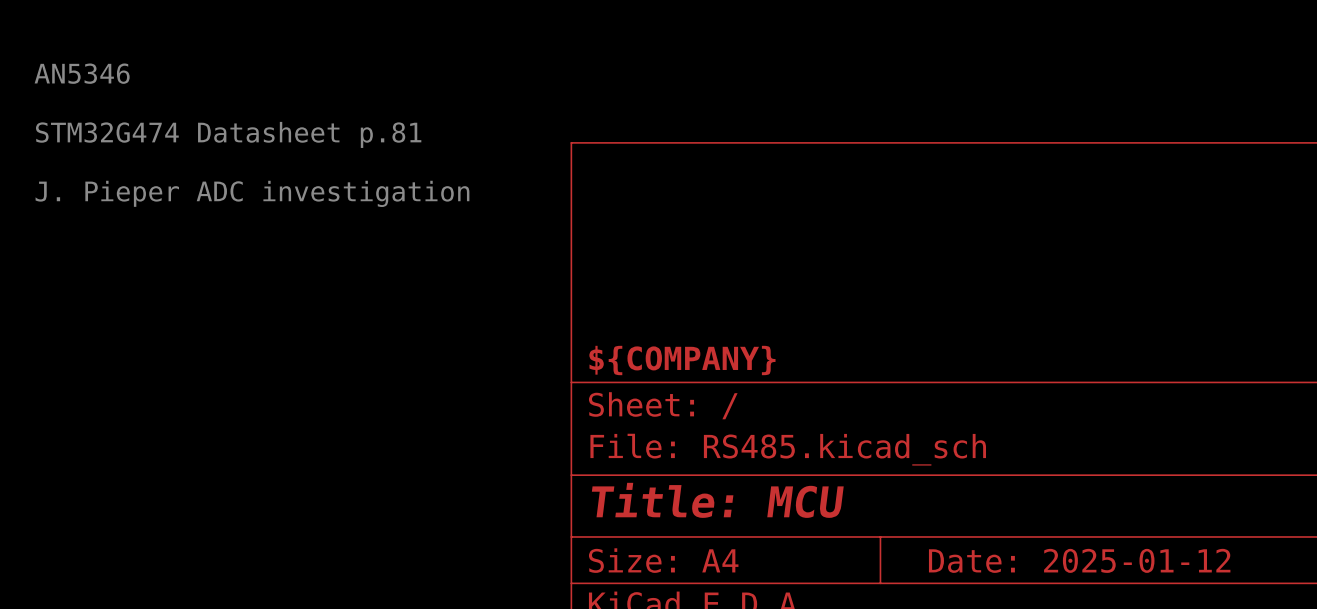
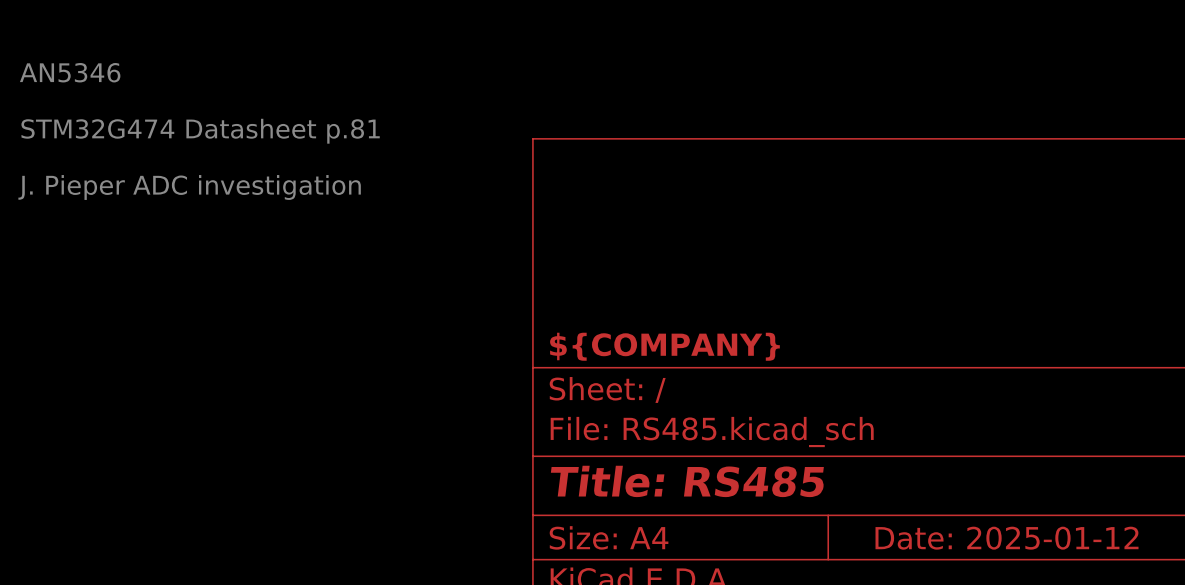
title block: Title: MCU (717, 500) -> Title: RS485 (687, 481)

